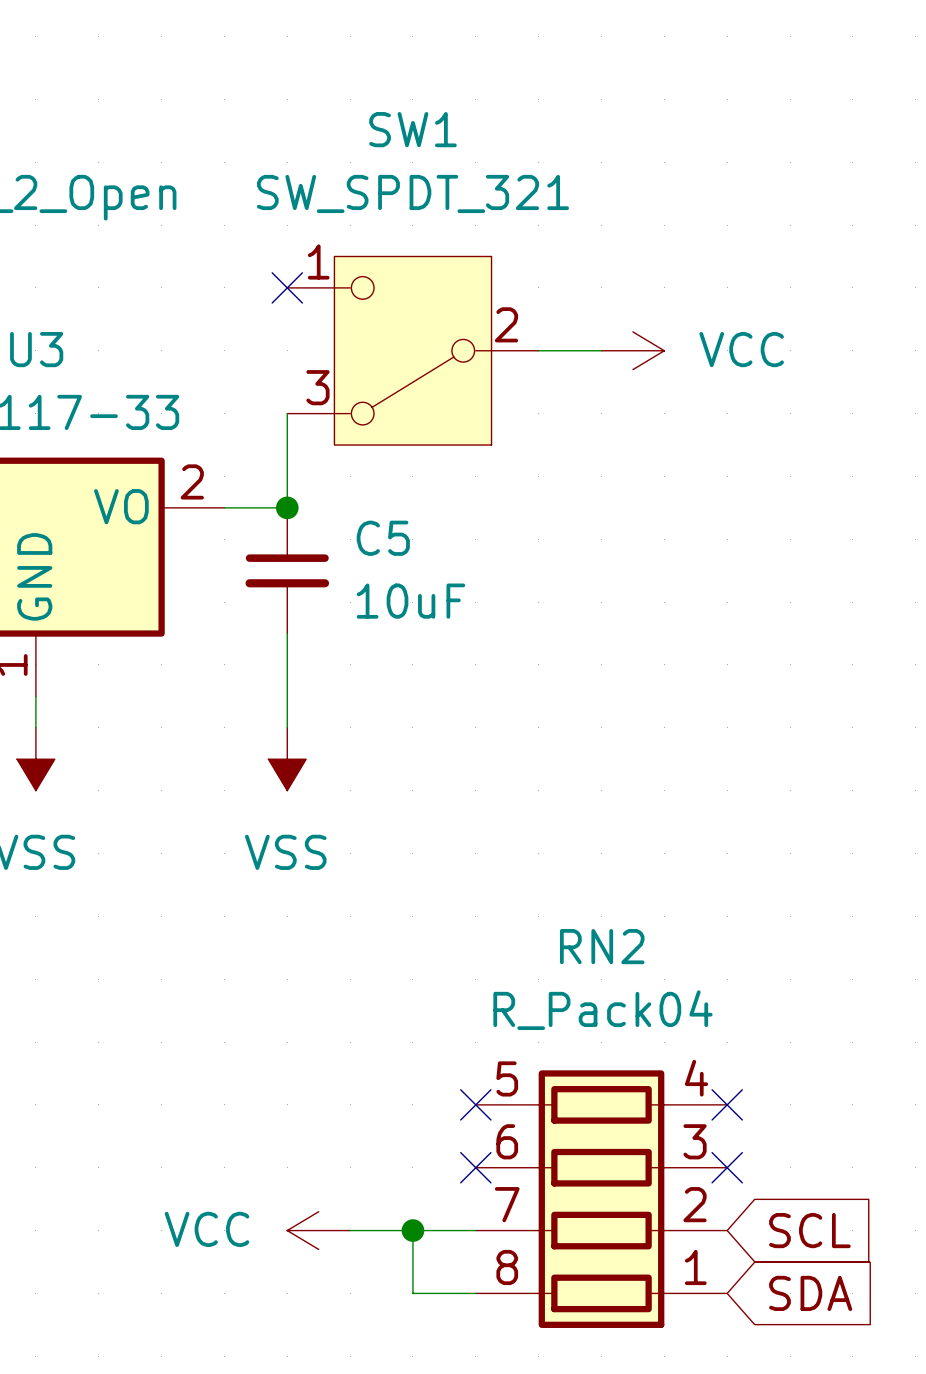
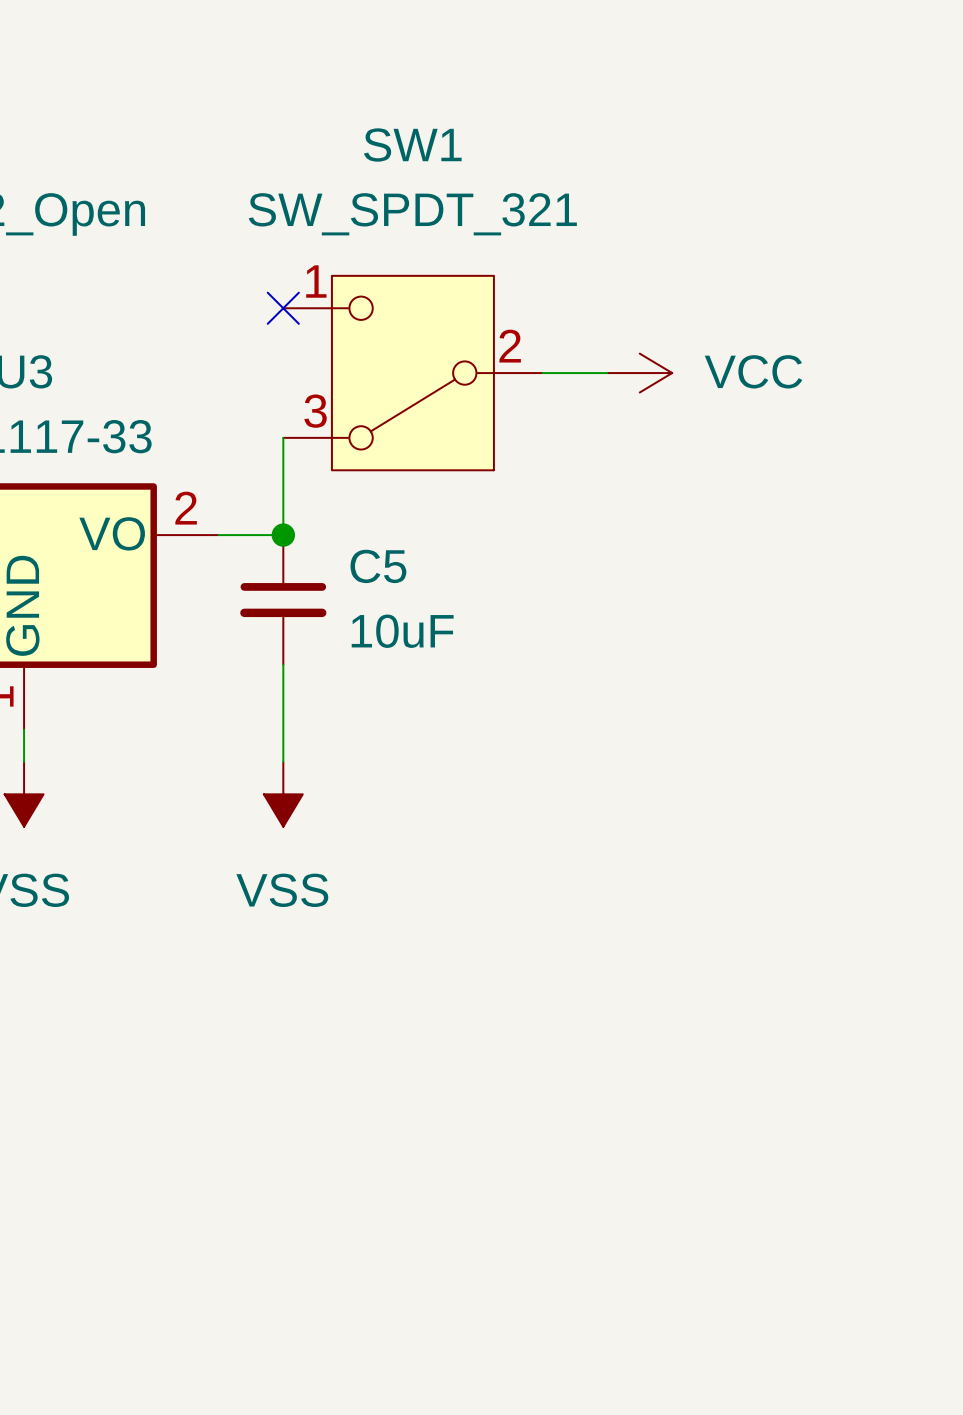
no-connect mark: (475, 1104) -> none
no-connect mark: (727, 1104) -> none
no-connect mark: (475, 1167) -> none
no-connect mark: (727, 1167) -> none
RN2: R_Pack04 (601, 1199) -> none
power symbol: VCC (318, 1230) -> none
wire: (350, 1230) (475, 1230) -> none
wire: (412, 1230) (412, 1293) (475, 1293) -> none
junction: (412, 1230) -> none
global label: SCL (809, 1230) -> none
global label: SDA (810, 1293) -> none

